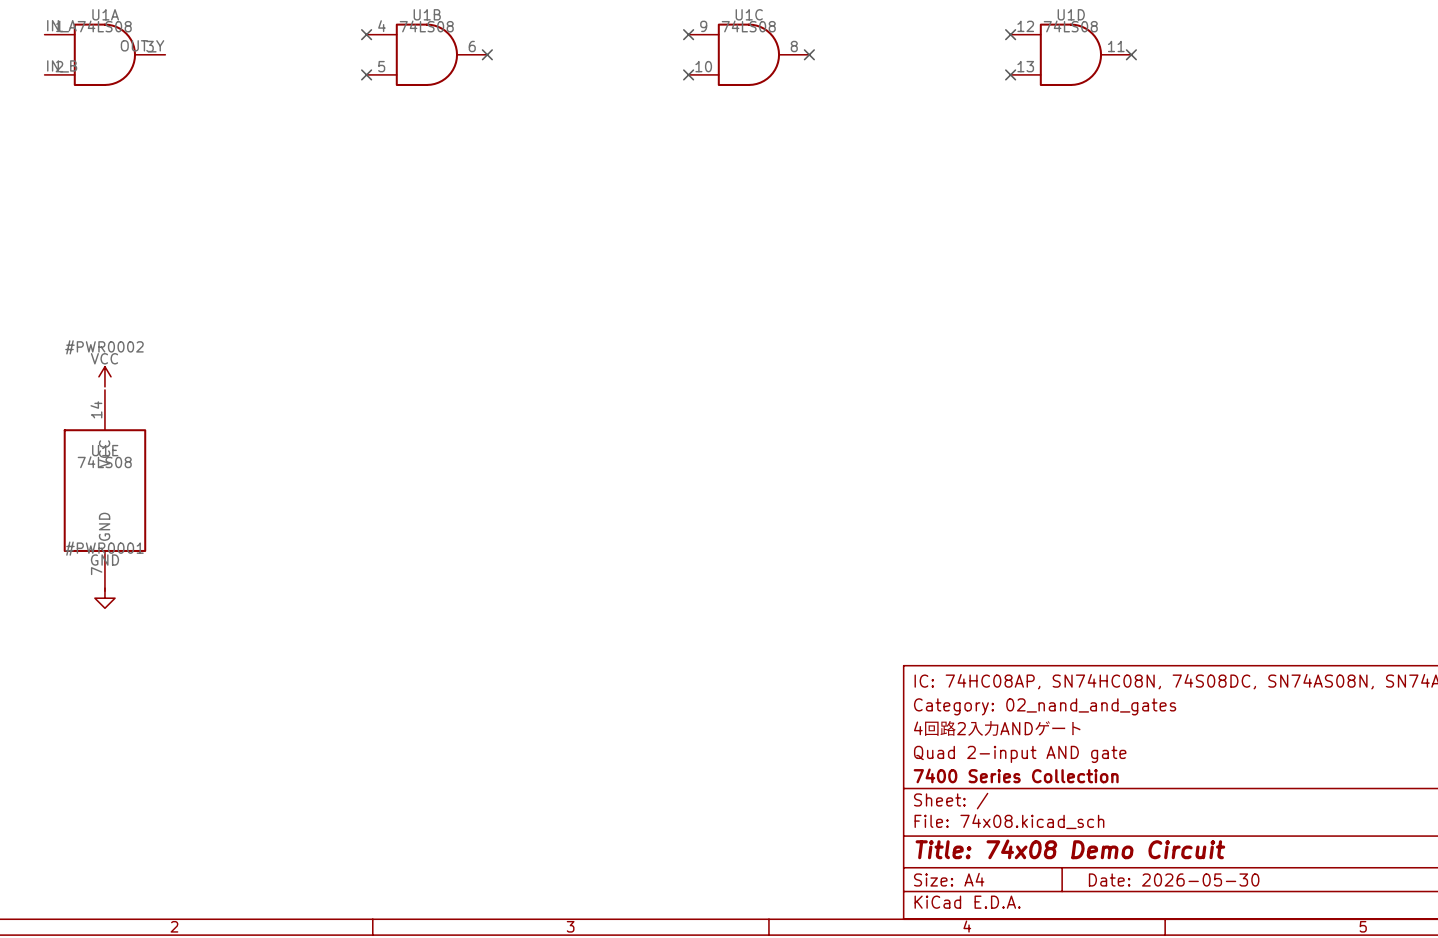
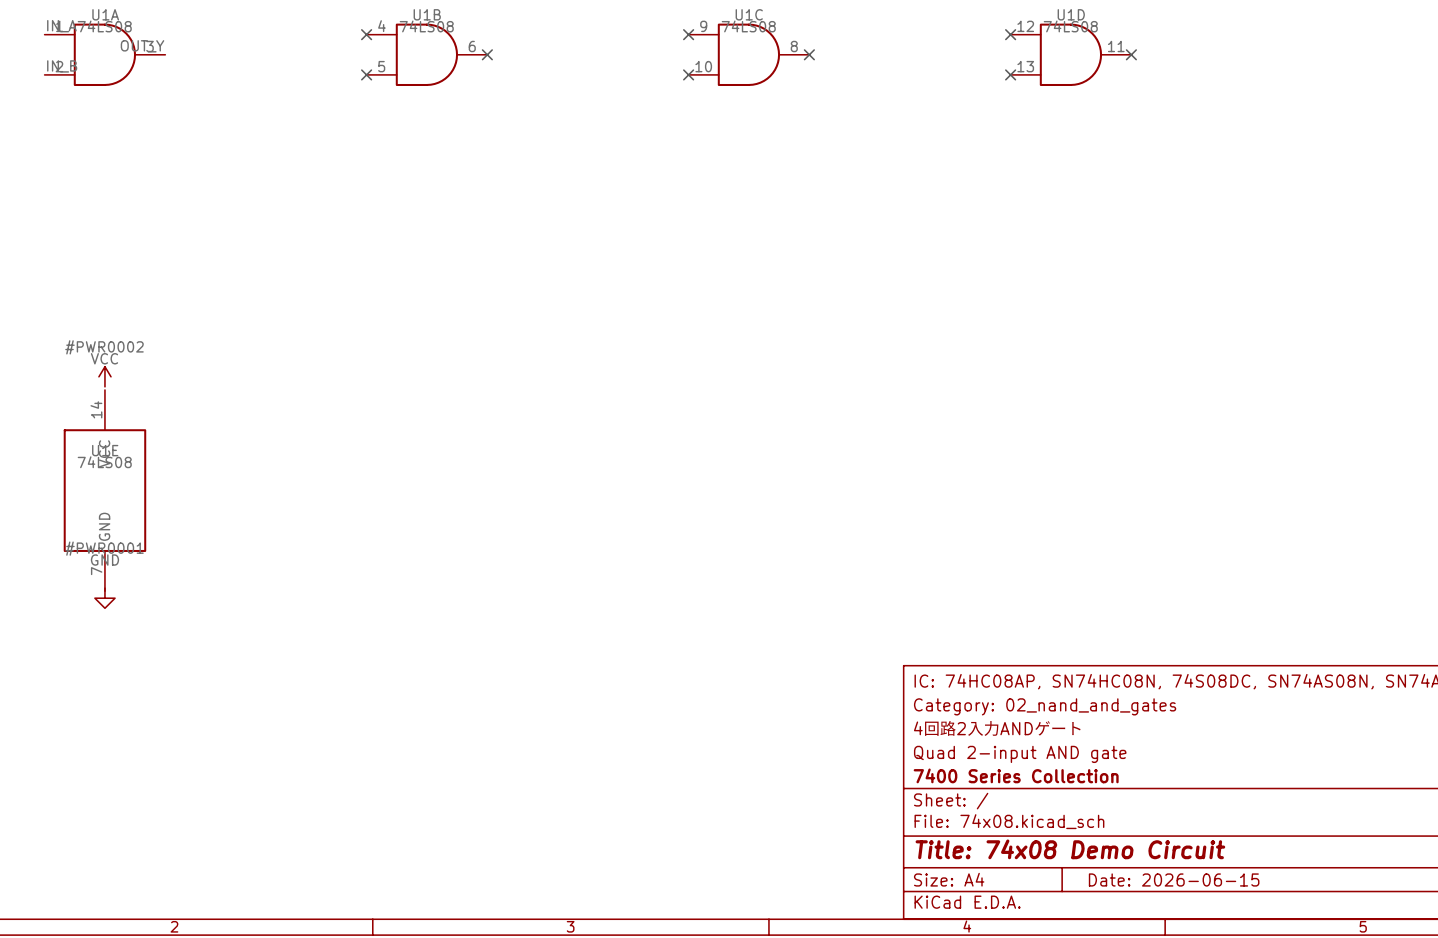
title block: Date: 2026-05-30 (1174, 879) -> Date: 2026-06-15 (1174, 879)

